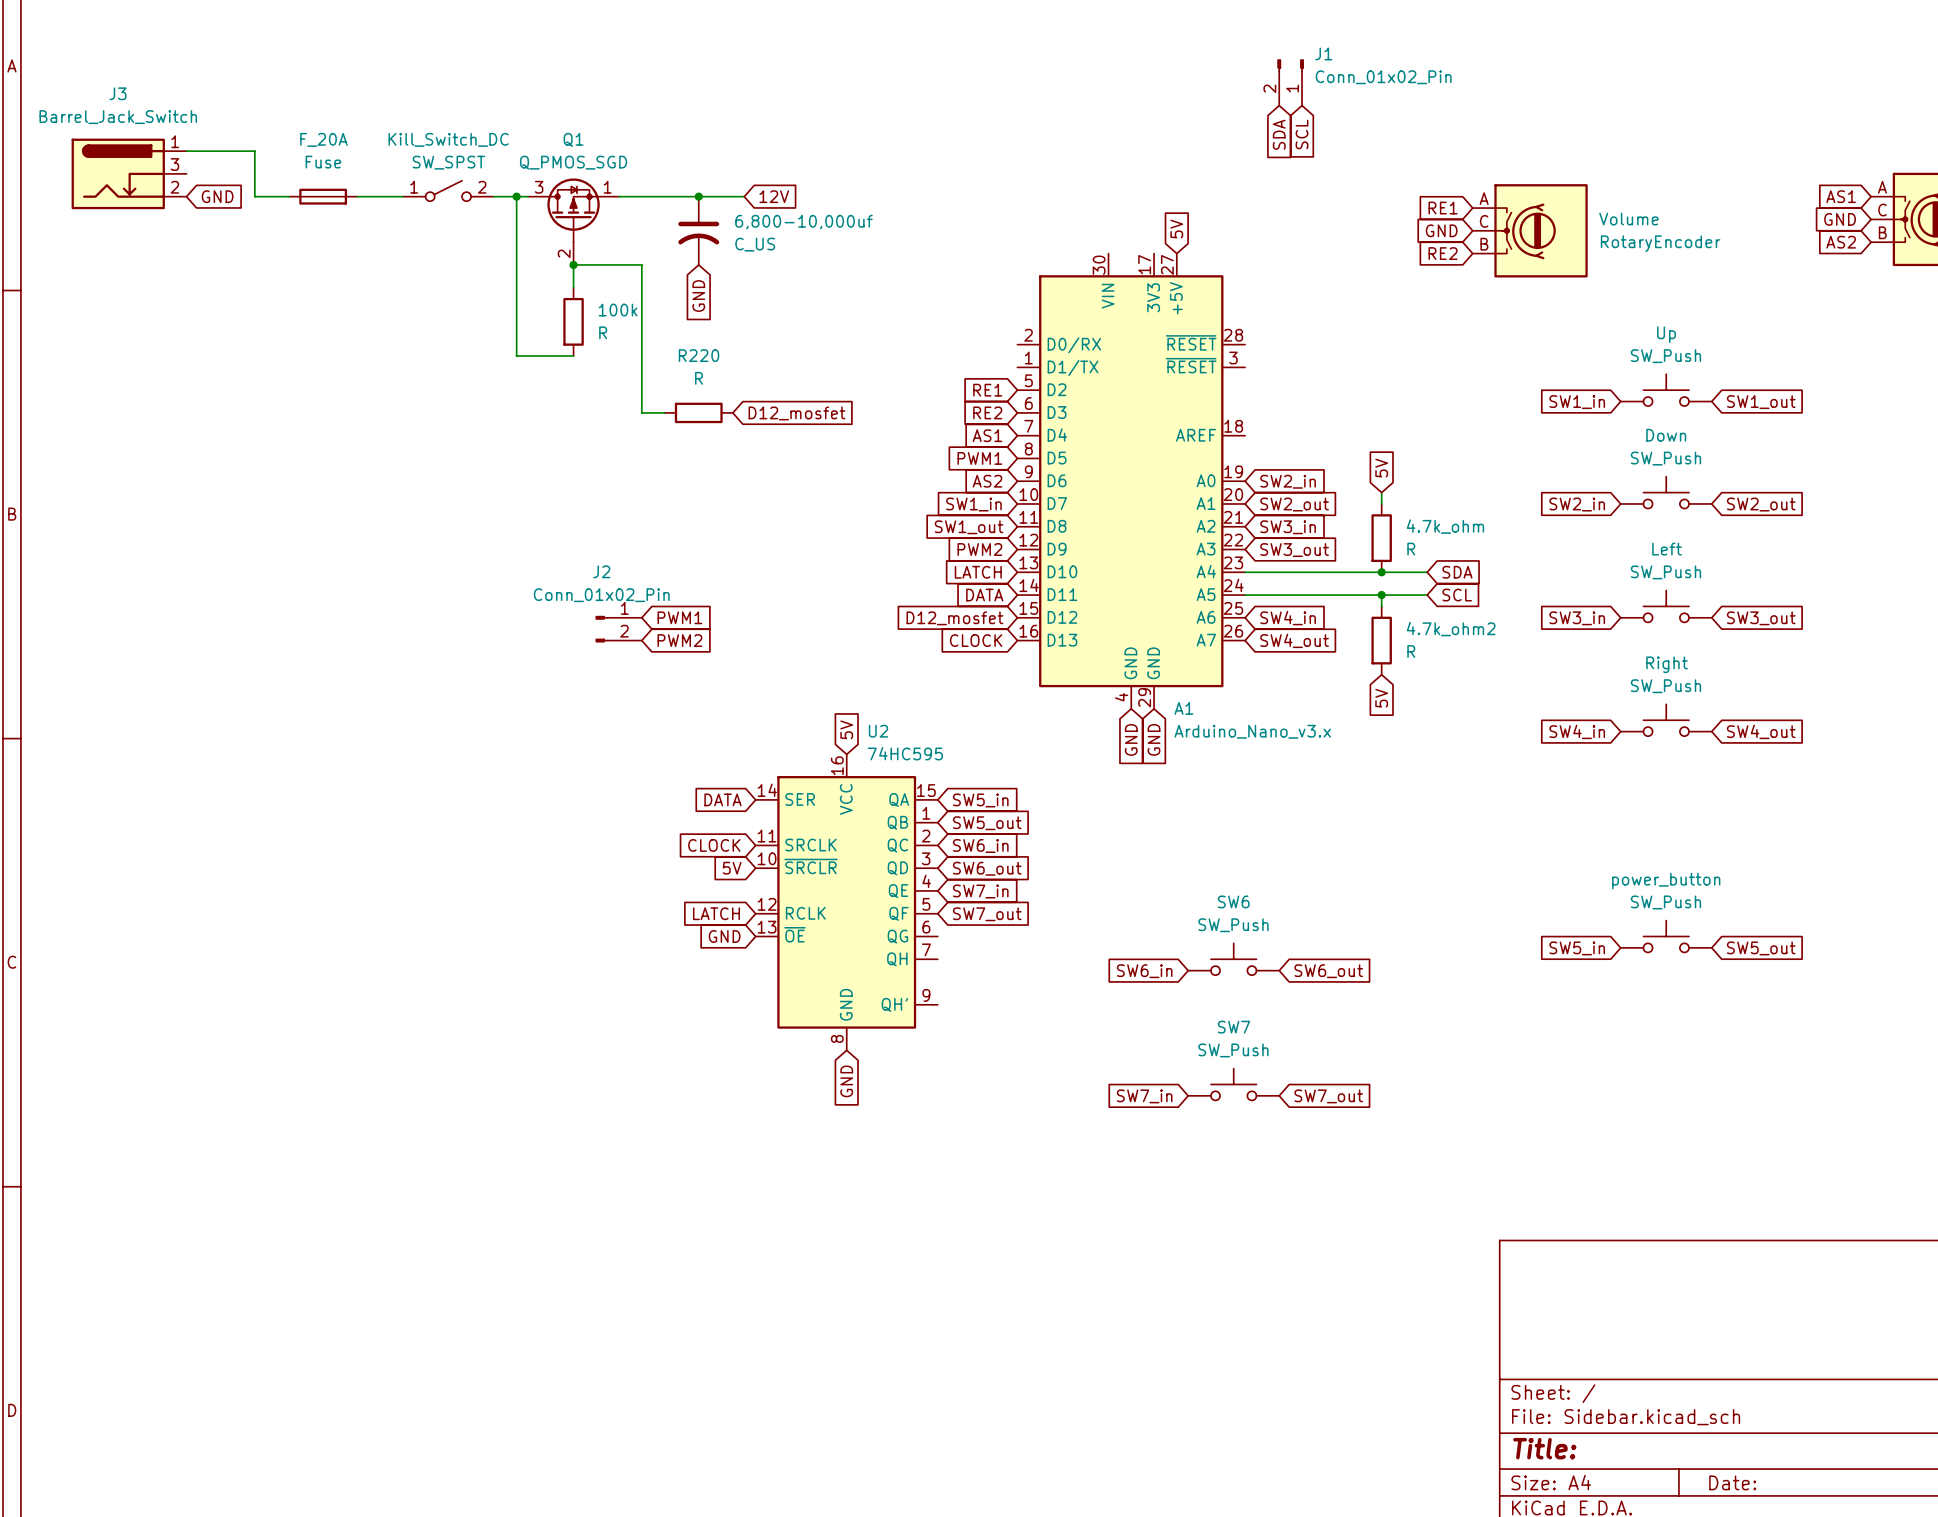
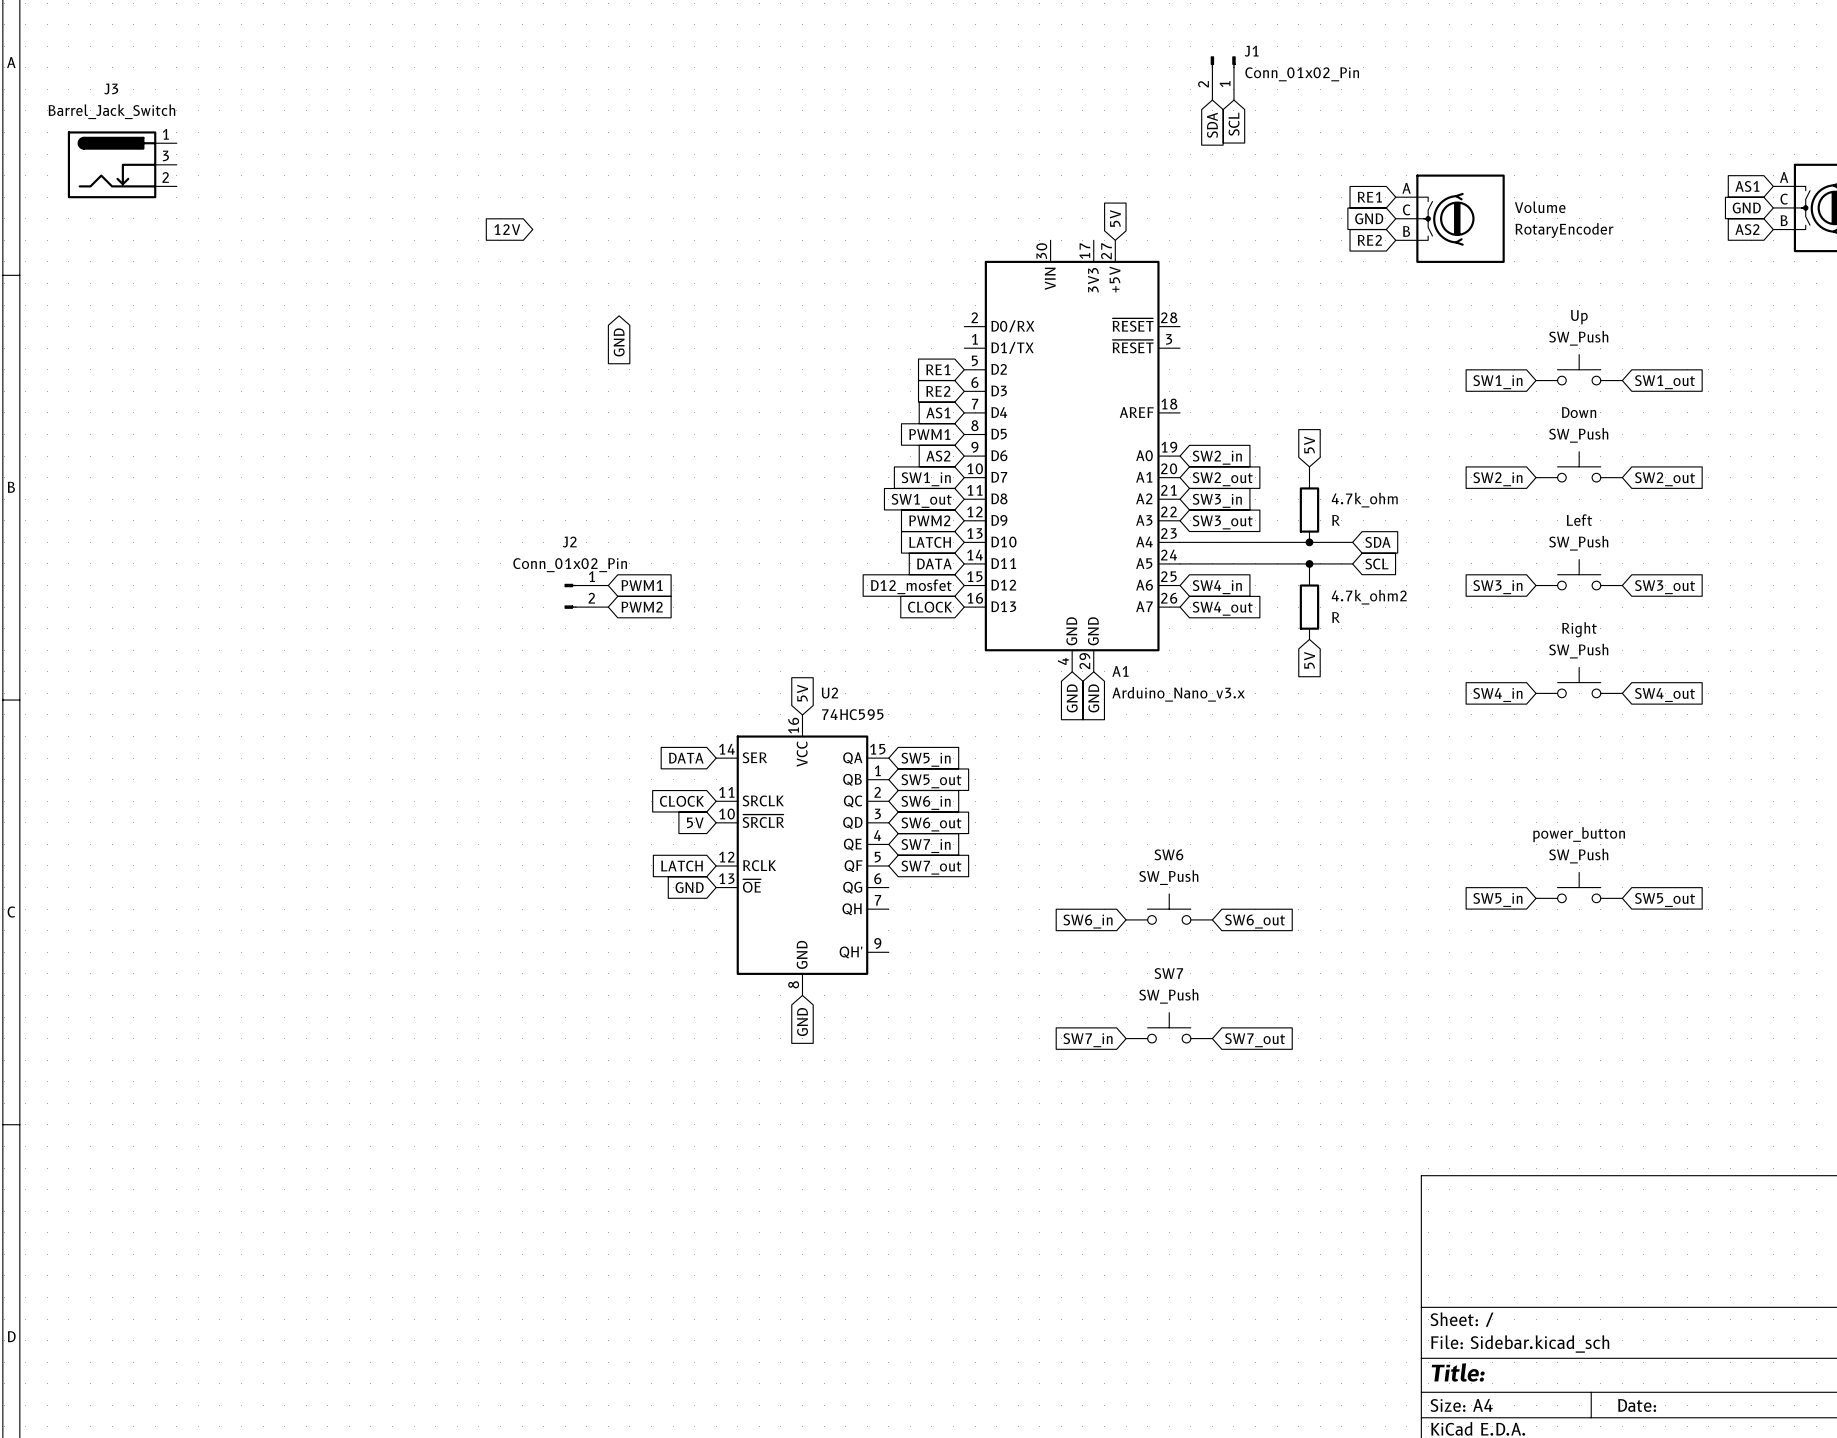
wire: (186, 151) (254, 151) (254, 196) (288, 196) -> none
Kill_Switch_DC: SW_SPST (448, 190) -> none
global label: GND (217, 196) -> none
F_20A: Fuse (323, 196) -> none
wire: (357, 196) (402, 196) -> none
wire: (493, 196) (528, 196) -> none
wire: (516, 196) (516, 356) (573, 356) -> none
junction: (516, 196) -> none
wire: (619, 196) (744, 196) -> none
junction: (698, 196) -> none
global label rotation: 0° (774, 196) -> 180° (507, 229)
global label position: 12V (774, 196) -> 12V (507, 229)
Q1: Q_PMOS_SGD (573, 221) -> none
6,800-10,000uf: C_US (698, 230) -> none
junction: (573, 264) -> none
wire: (573, 287) (573, 264) (641, 264) (641, 412) (664, 412) -> none
global label position: GND (698, 296) -> GND (619, 342)
100k: R (573, 321) -> none
R220: R (698, 412) -> none
global label: D12_mosfet (797, 413) -> none

